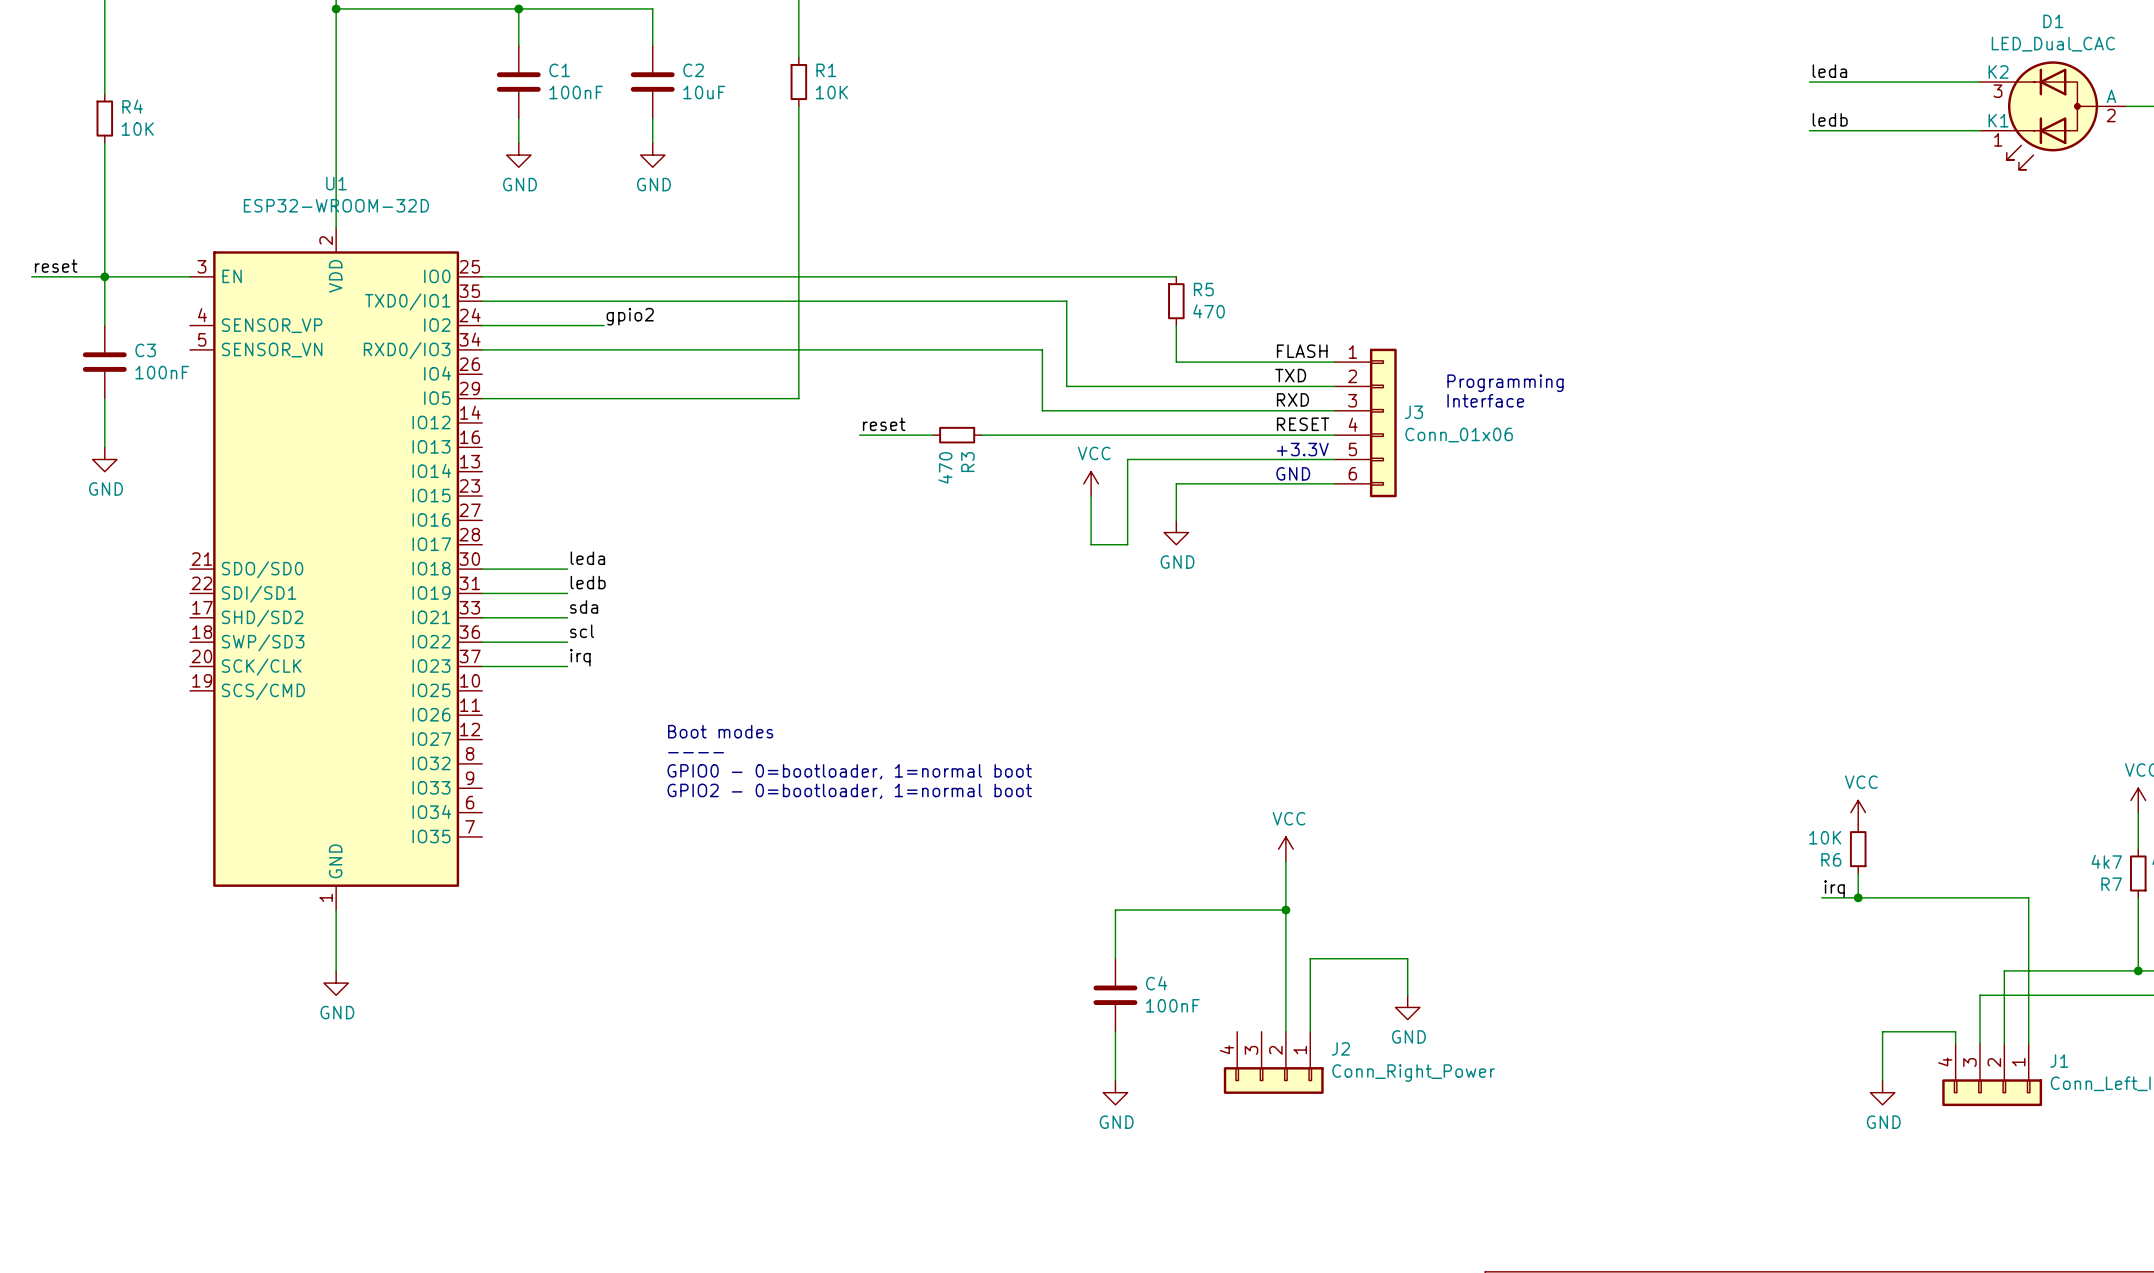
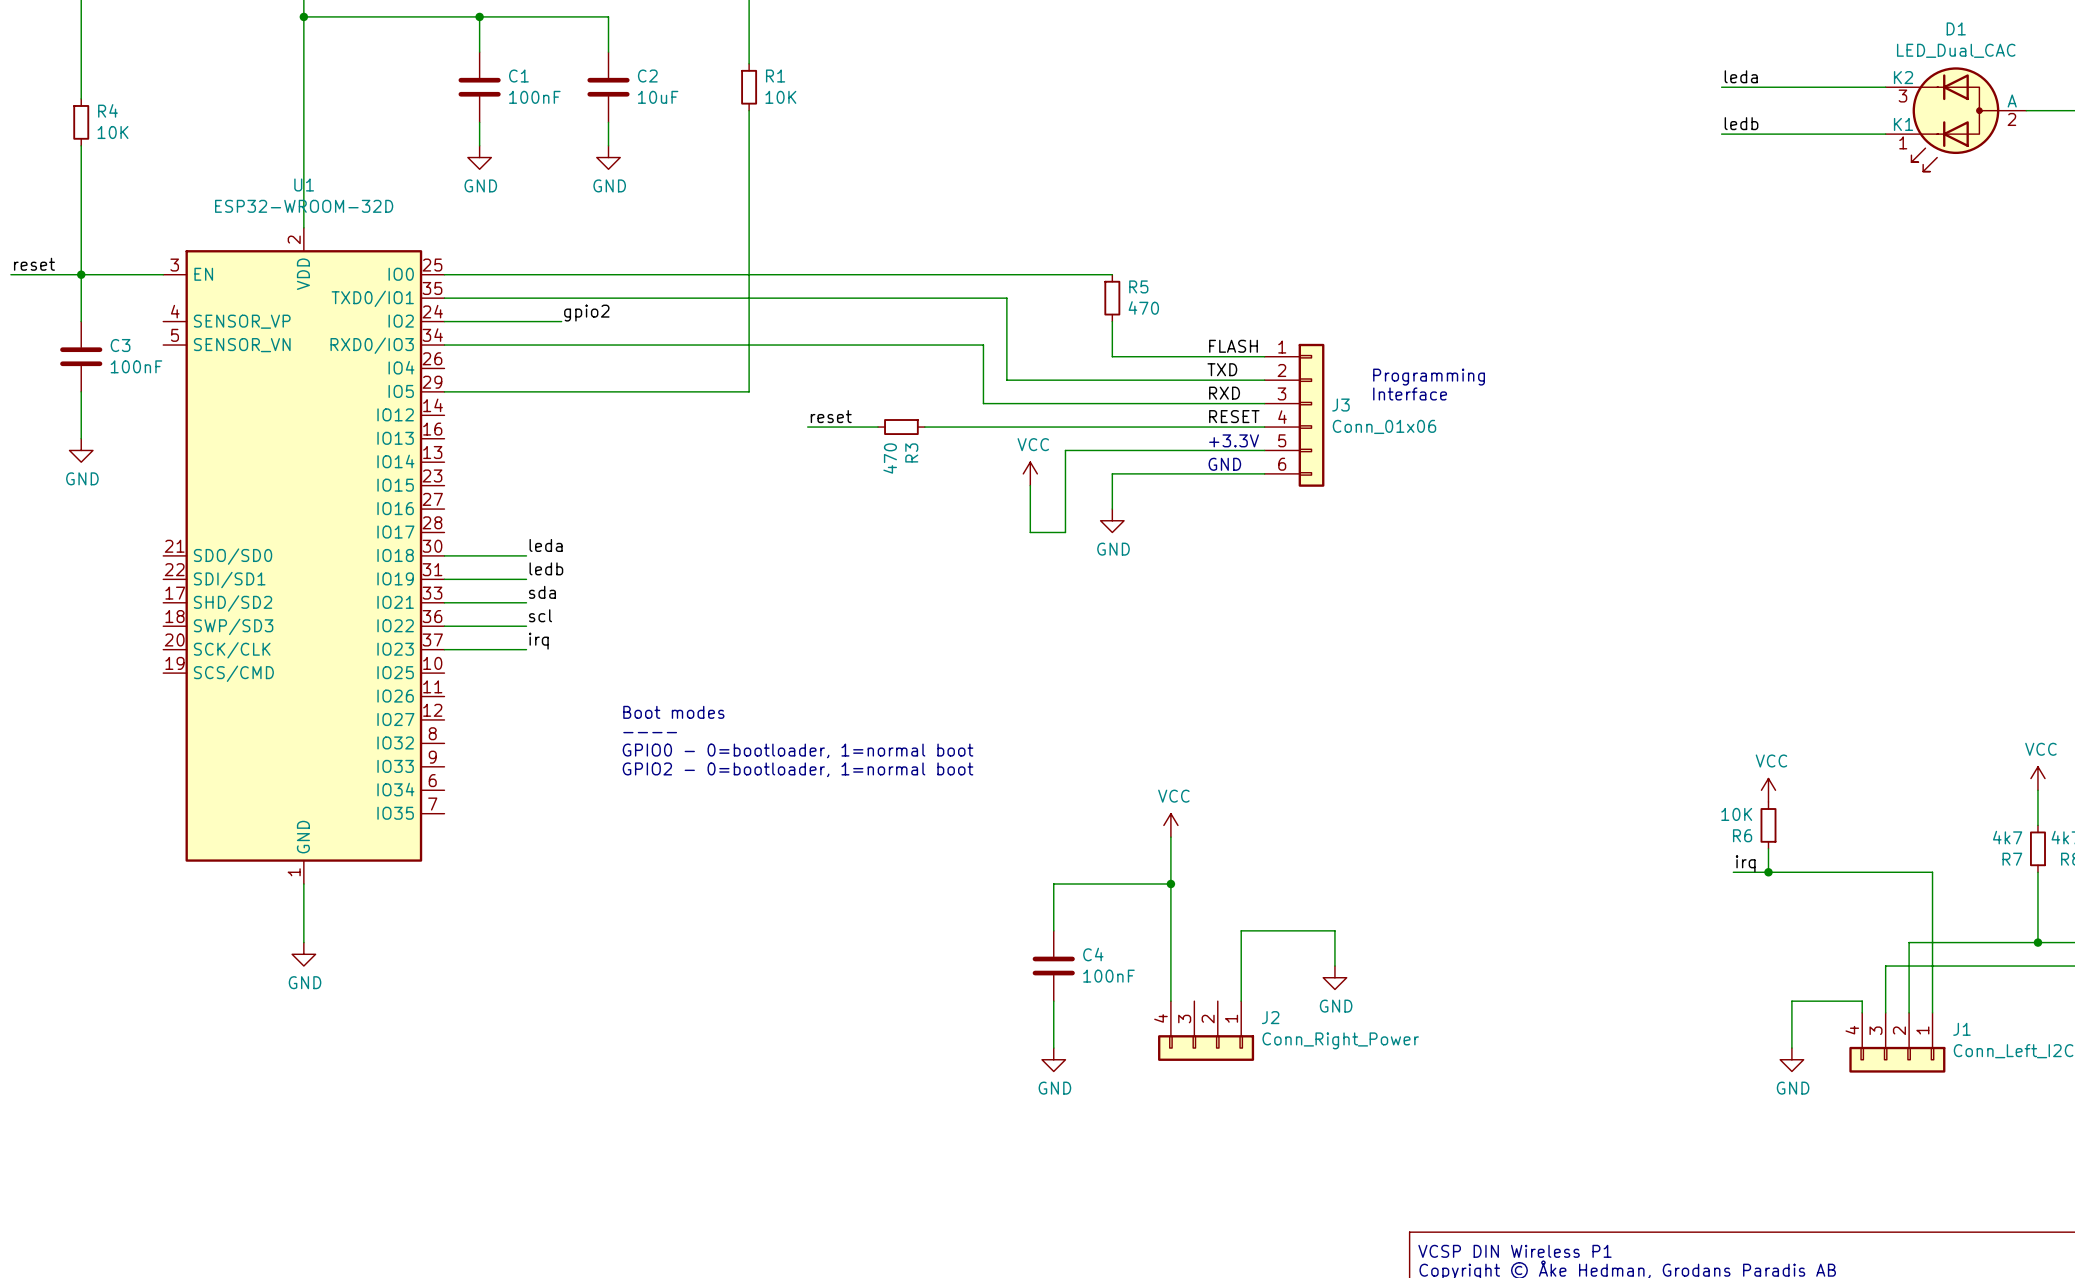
power symbol position: VCC (1285, 849) -> VCC (1170, 825)
wire: (1285, 861) (1285, 1031) -> (1170, 837) (1170, 1001)
wire: (1237, 910) (1285, 910) -> none
junction position: (1285, 910) -> (1170, 883)

